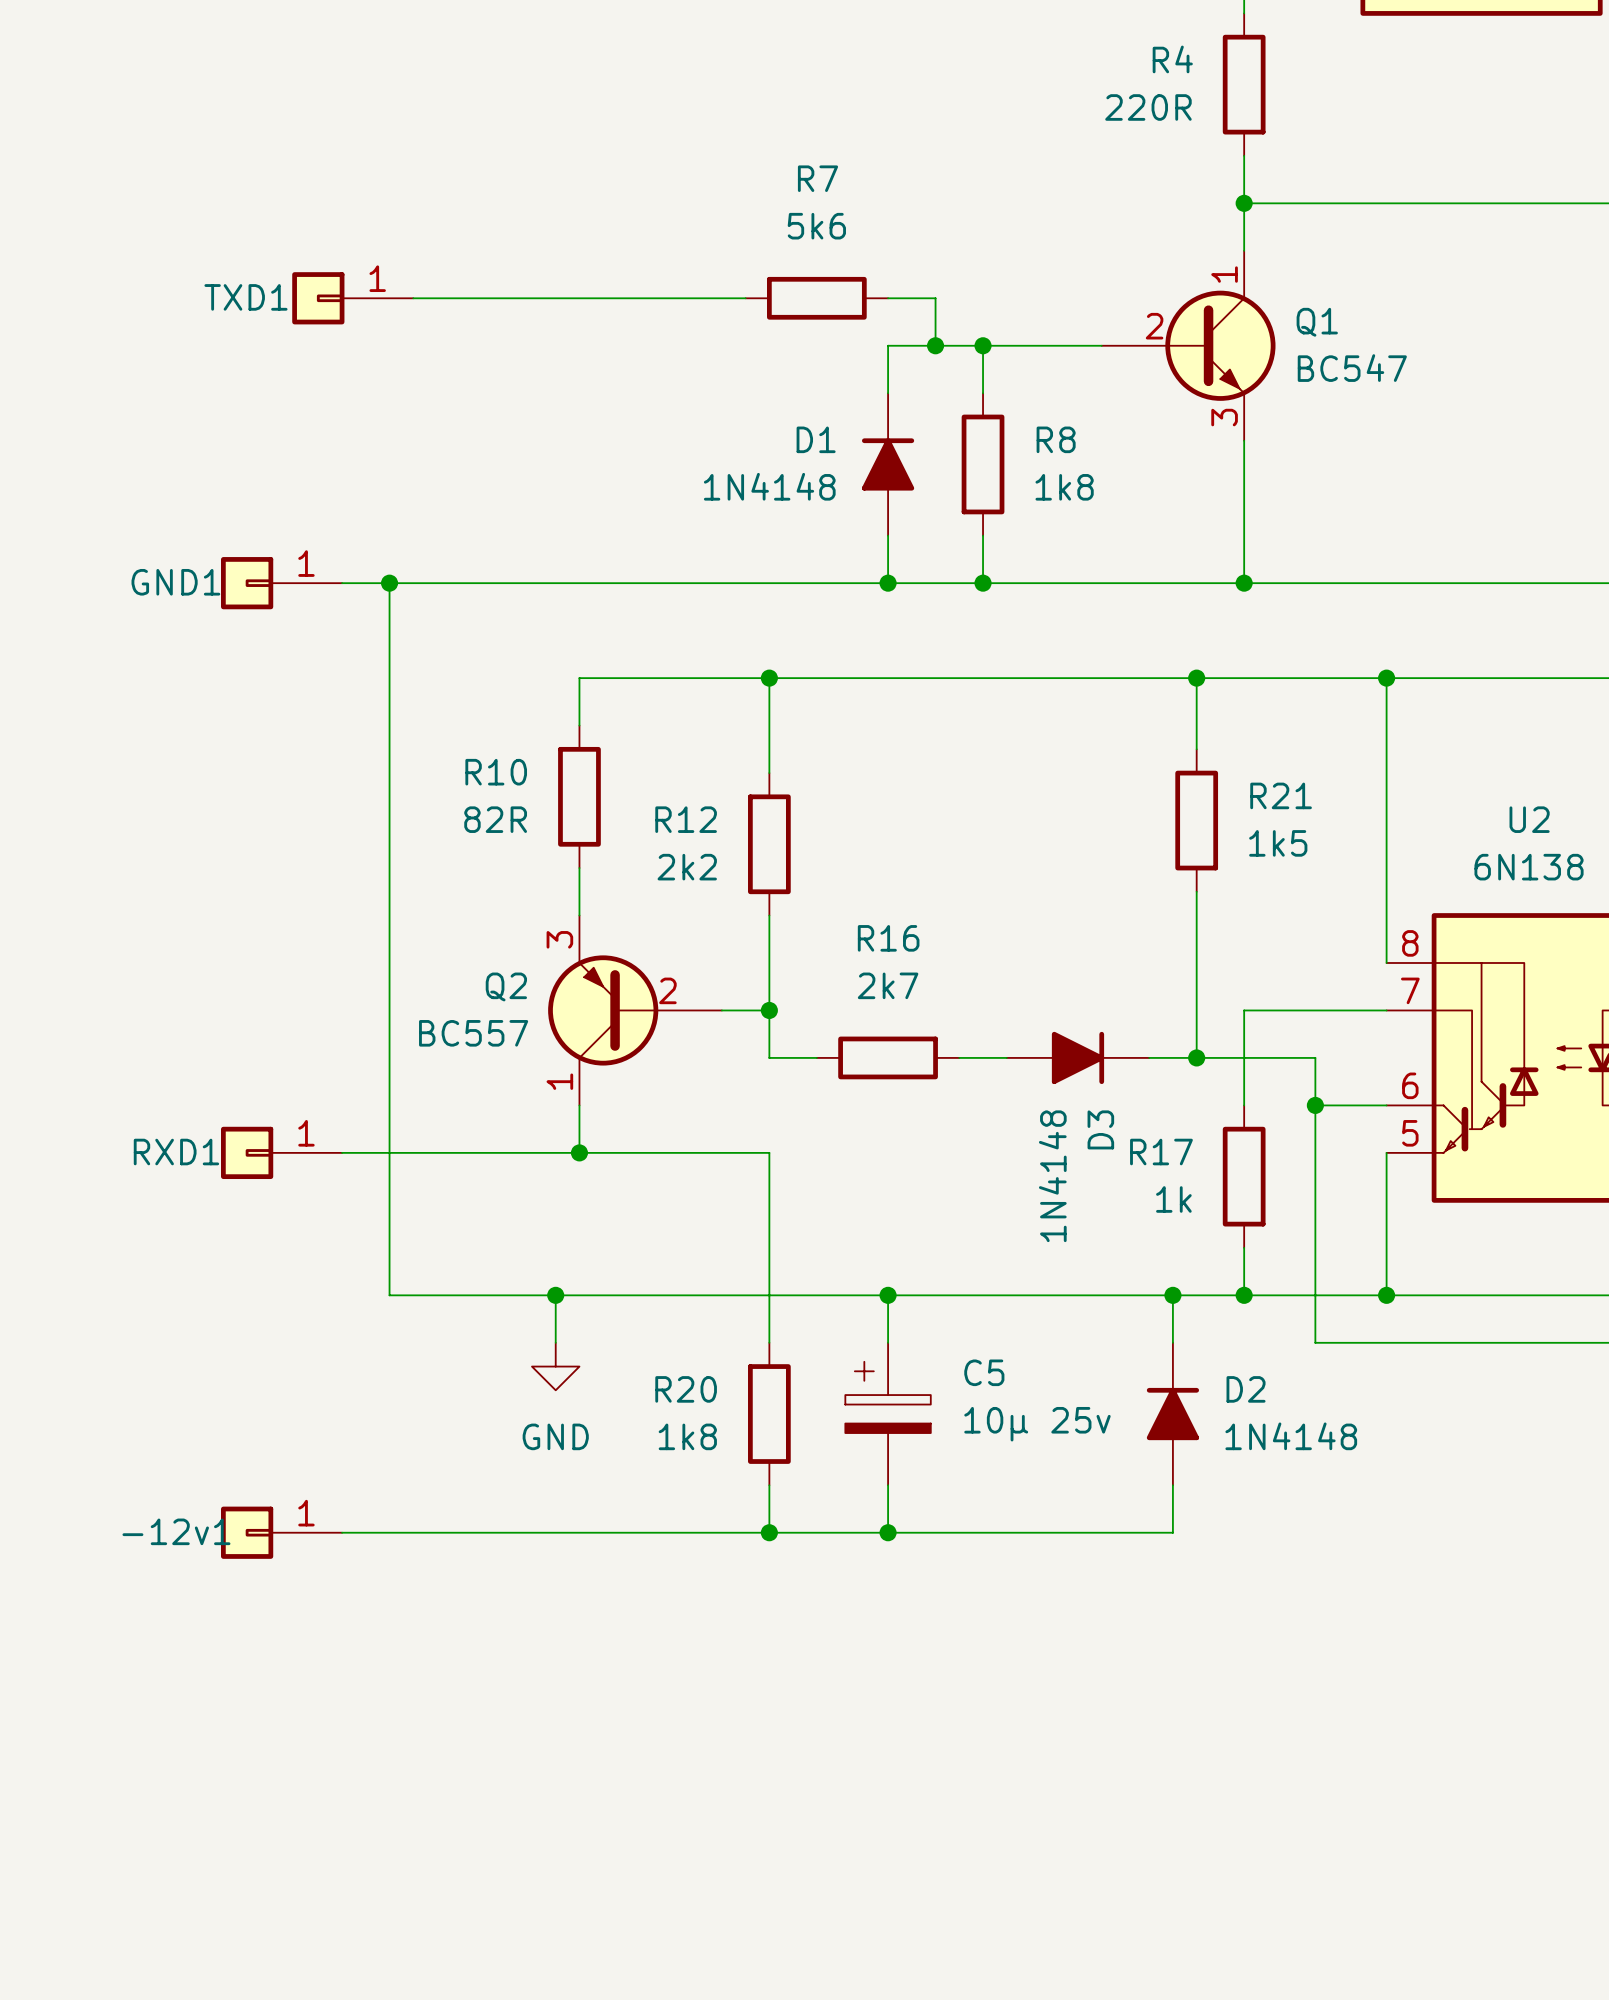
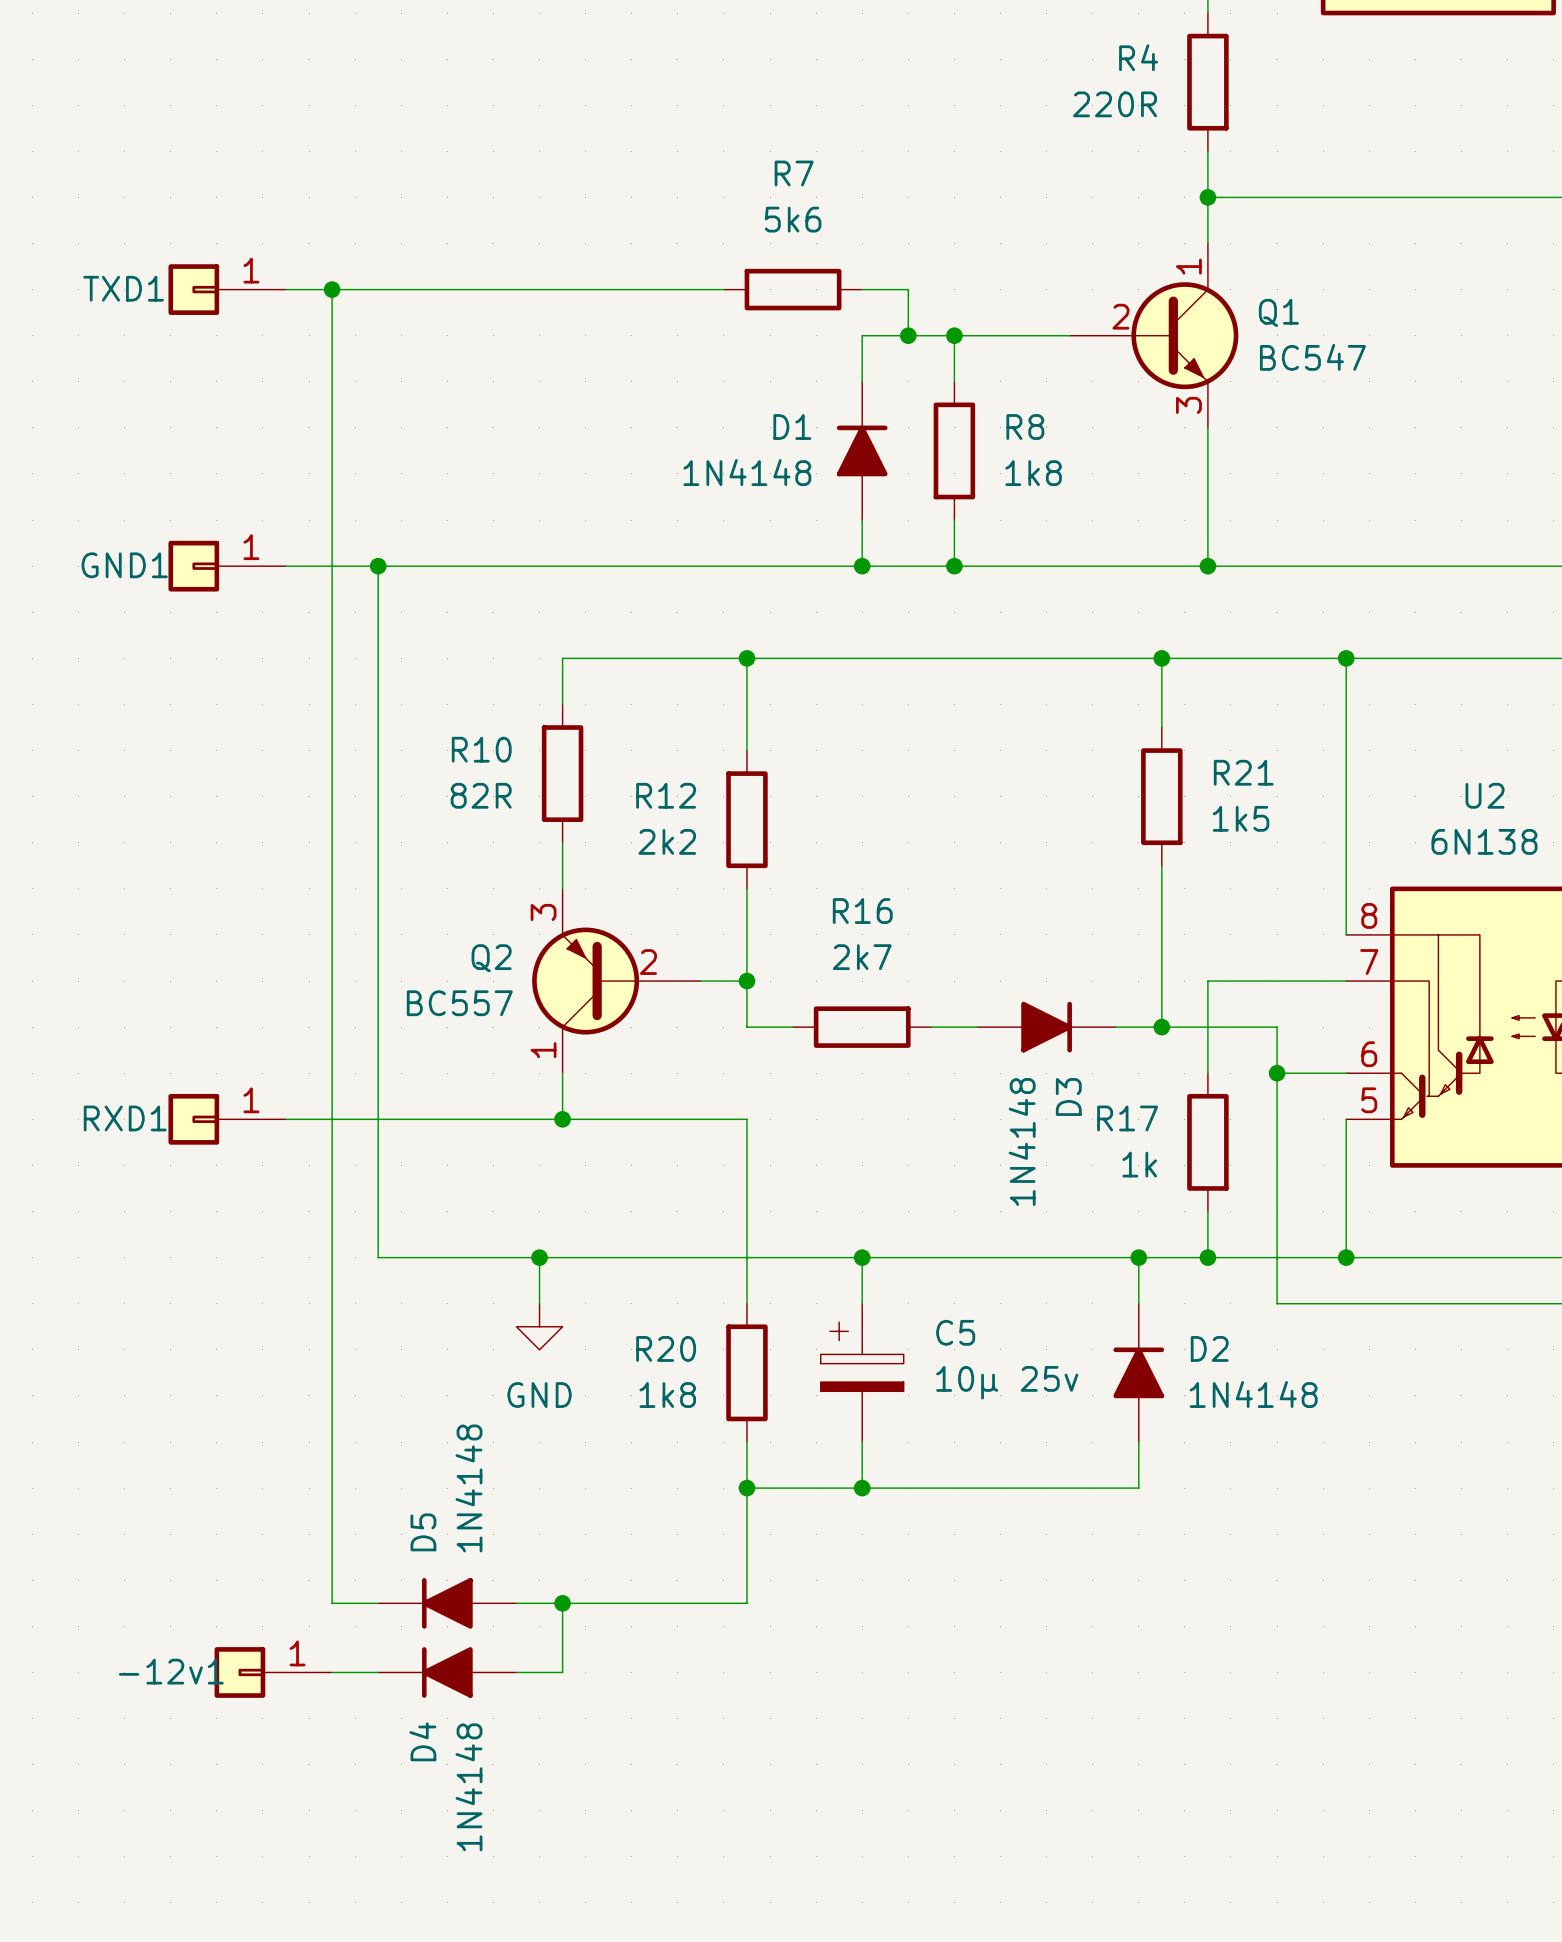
wire: none -> (332, 289) (332, 1603) (378, 1603)
junction: none -> (332, 289)
TXD1 position: (352, 298) -> (227, 289)
GND1 position: (281, 583) -> (227, 566)
RXD1 position: (281, 1152) -> (227, 1119)
-12v1 position: (281, 1532) -> (273, 1672)
wire: (342, 1532) (769, 1532) -> (516, 1603) (746, 1603) (746, 1488)
D5: none -> 1N4148 (447, 1603)
wire: none -> (562, 1603) (562, 1672) (516, 1672)
junction: none -> (562, 1603)
wire: none -> (332, 1672) (378, 1672)
D4: none -> 1N4148 (447, 1672)

